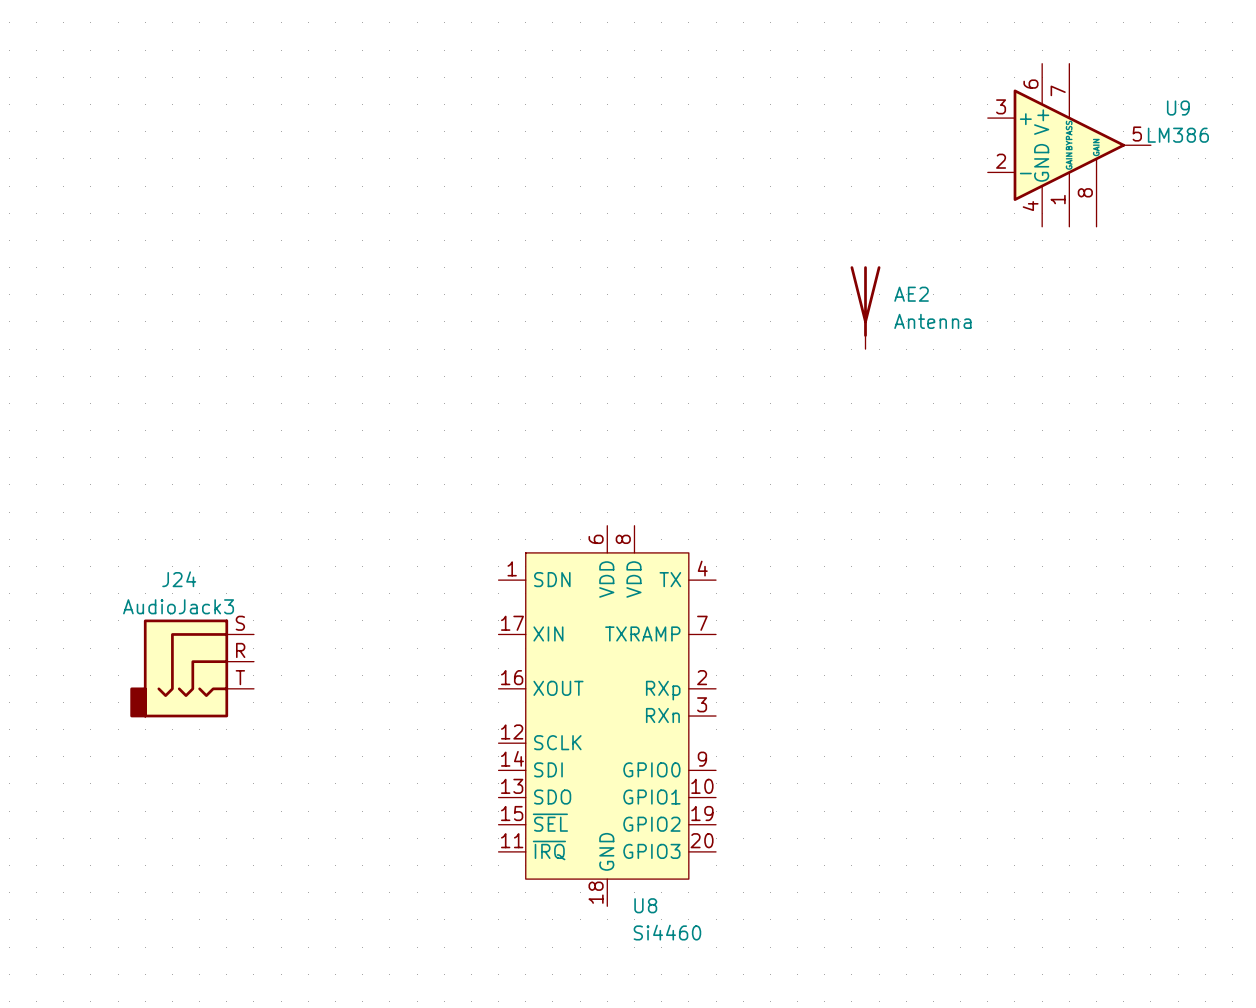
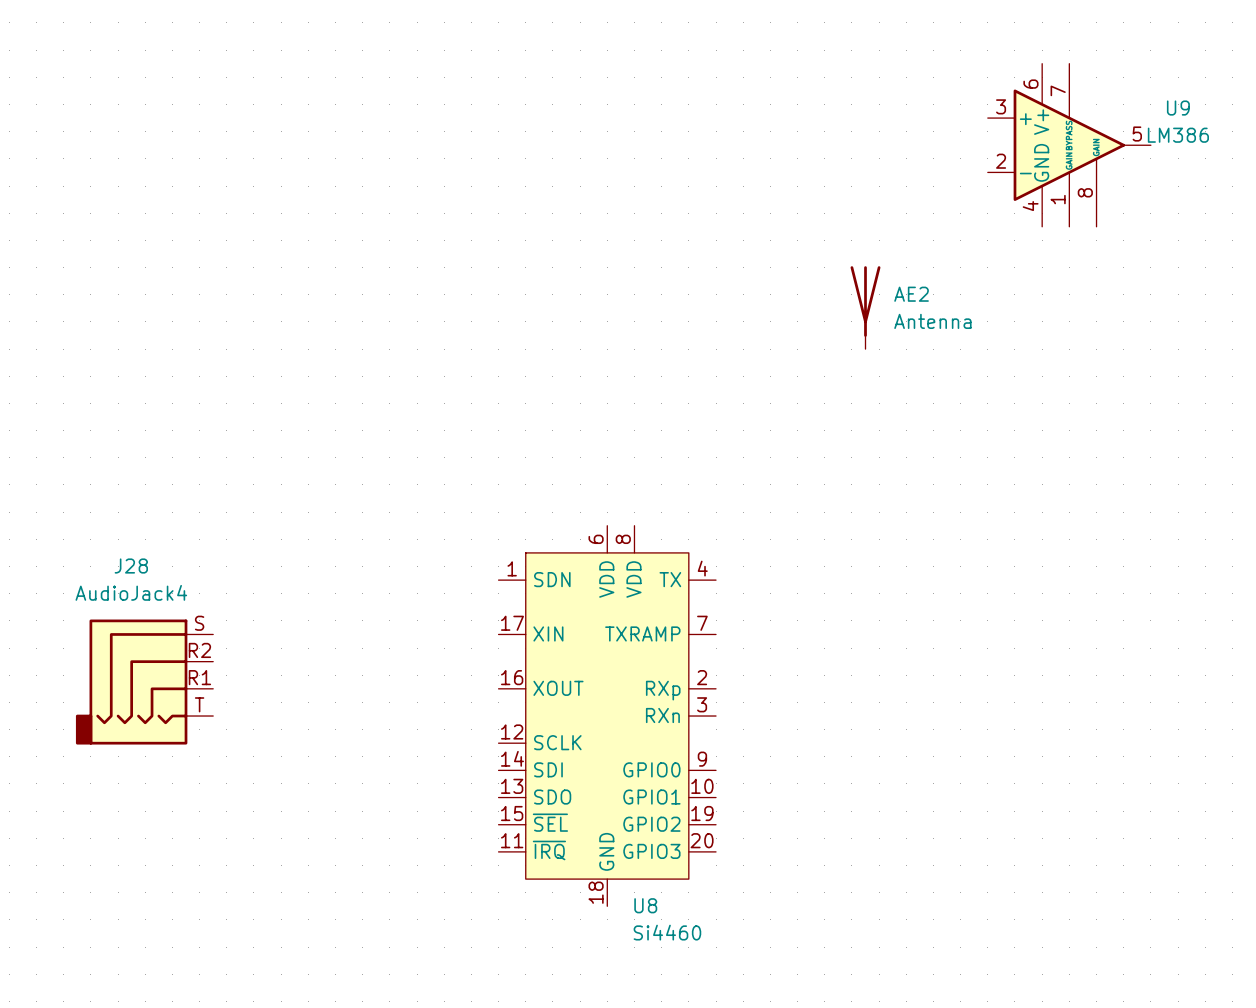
J24: AudioJack3 (192, 668) -> none
J28: none -> AudioJack4 (144, 682)

